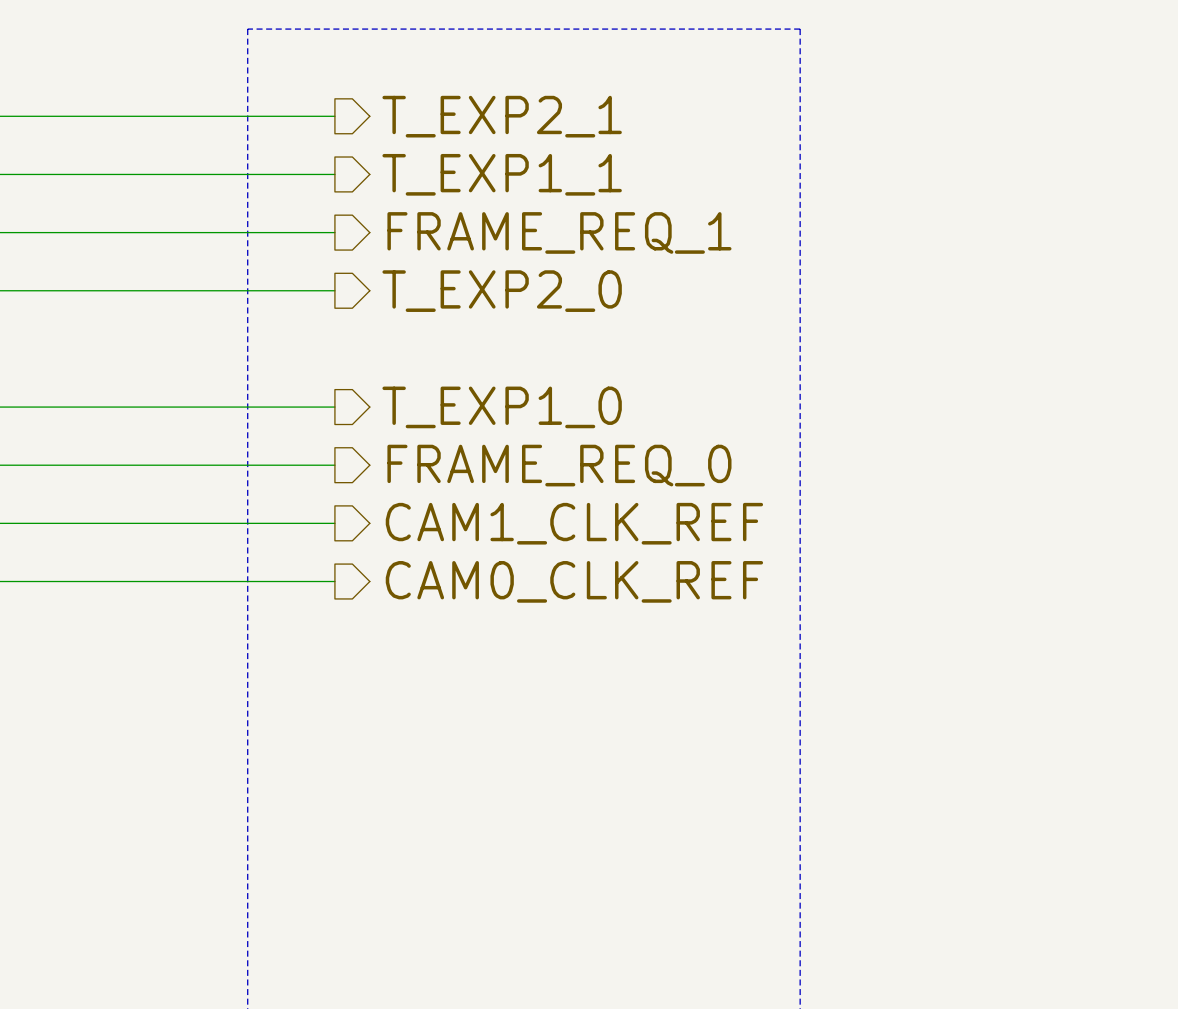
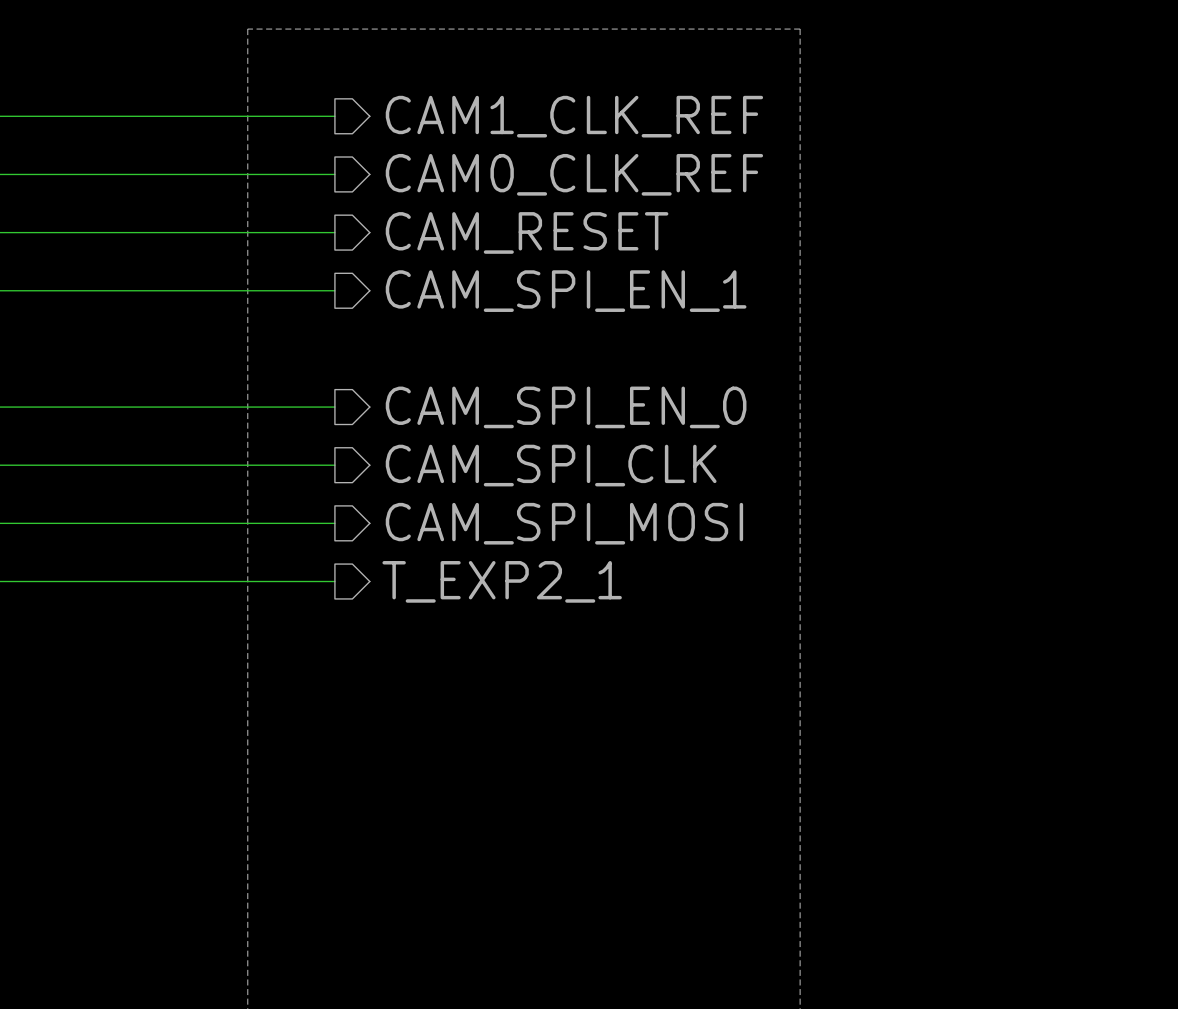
hierarchical label: T_EXP2_1 (502, 116) -> CAM1_CLK_REF (574, 116)
hierarchical label: T_EXP1_1 (502, 174) -> CAM0_CLK_REF (574, 174)
hierarchical label: FRAME_REQ_1 (559, 232) -> CAM_RESET (527, 232)
hierarchical label: T_EXP2_0 (502, 291) -> CAM_SPI_EN_1 (566, 291)
hierarchical label: T_EXP1_0 (502, 407) -> CAM_SPI_EN_0 (566, 407)
hierarchical label: FRAME_REQ_0 (559, 465) -> CAM_SPI_CLK (551, 465)
hierarchical label: CAM1_CLK_REF (574, 523) -> CAM_SPI_MOSI (564, 523)
hierarchical label: CAM0_CLK_REF (574, 581) -> T_EXP2_1 (502, 581)

